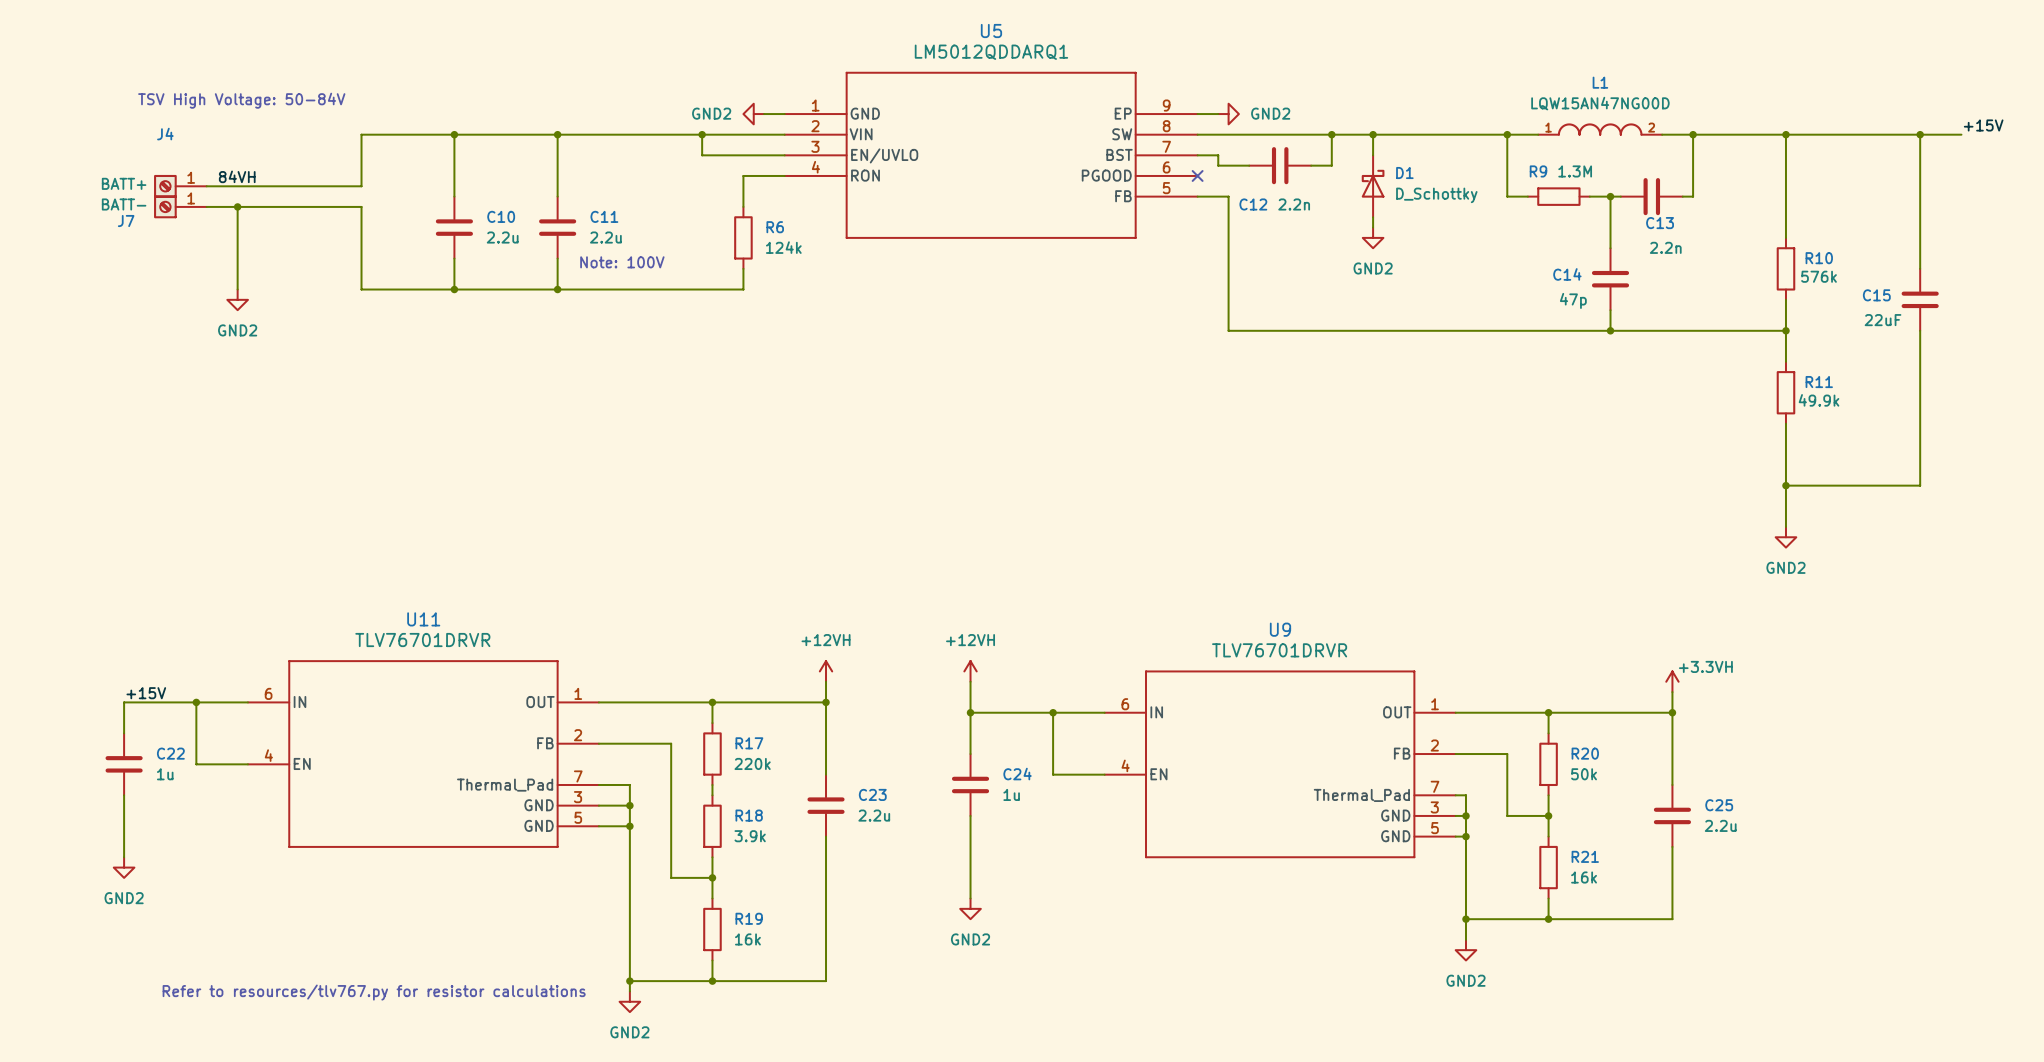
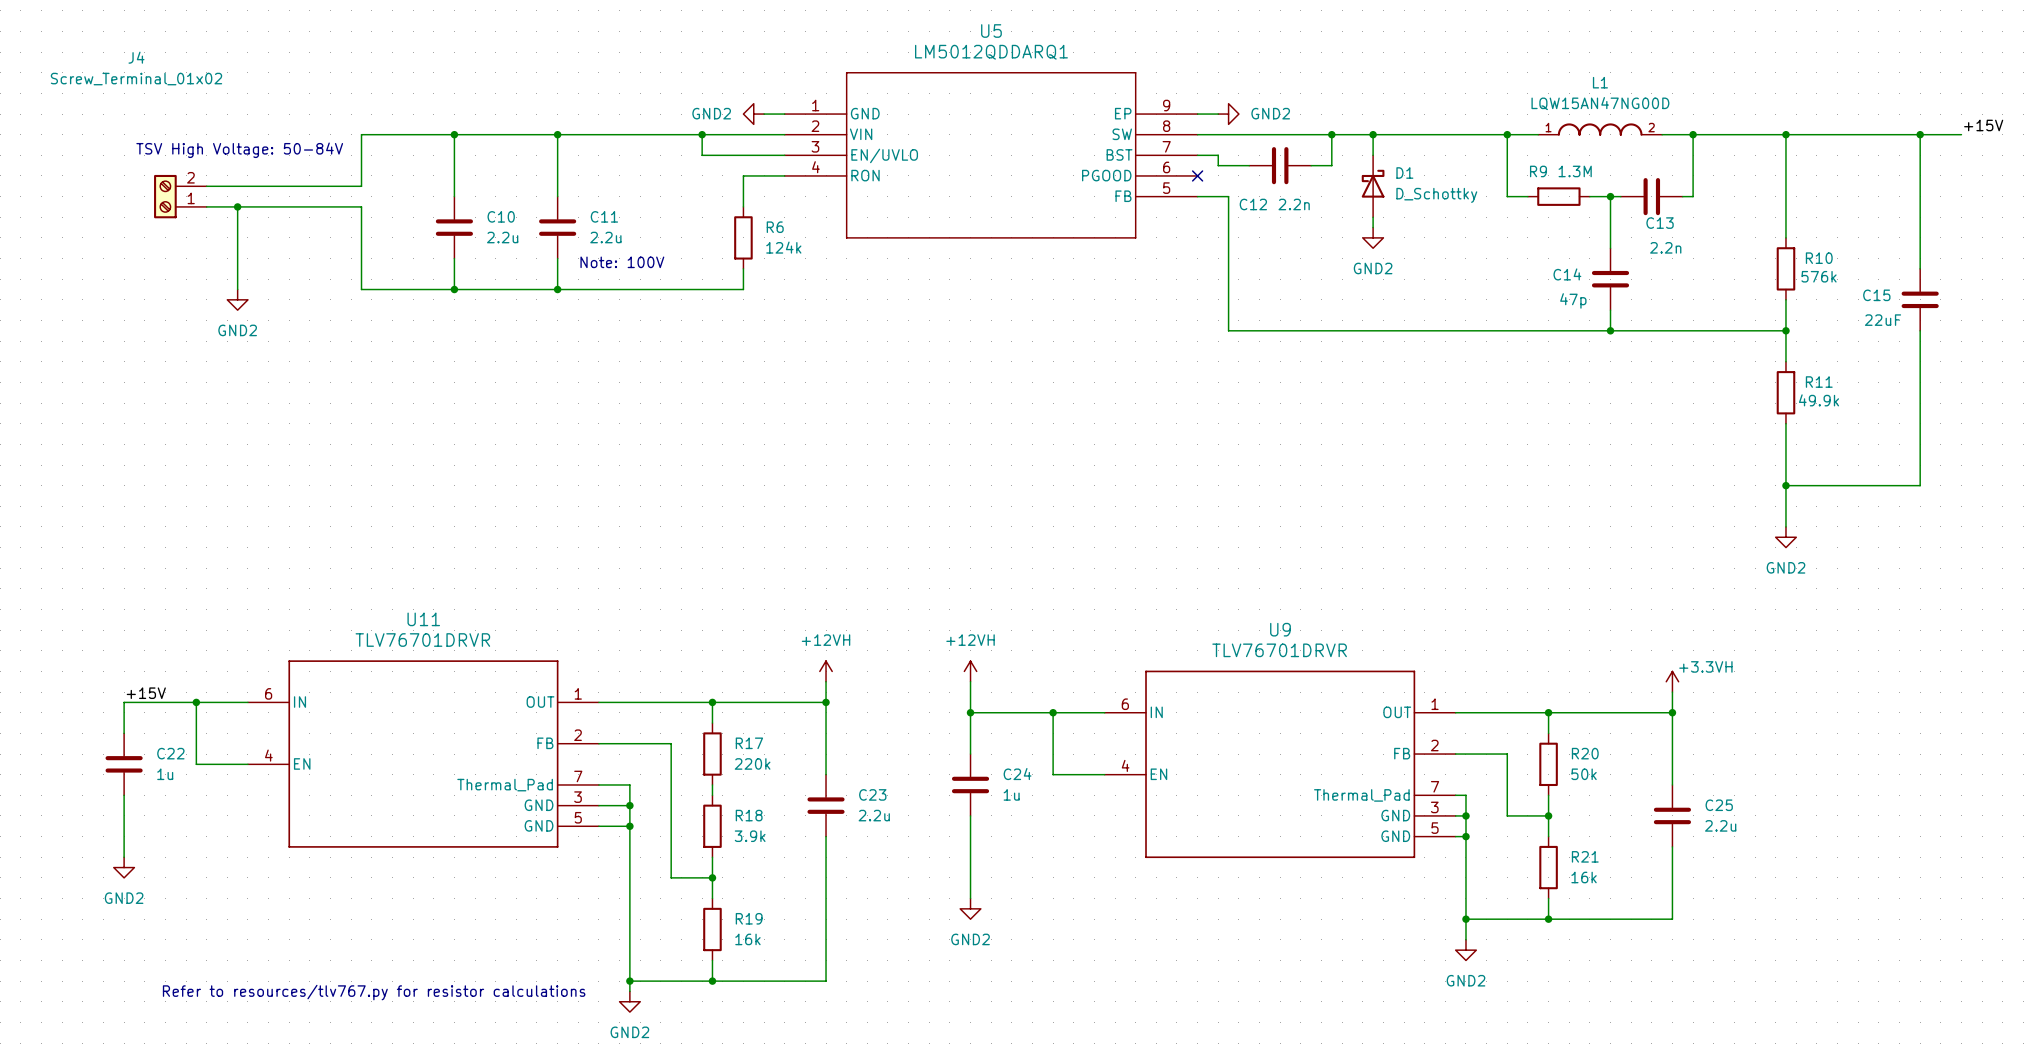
text position: TSV High Voltage: 50-84V (241, 100) -> TSV High Voltage: 50-84V (239, 150)
J4 name position: J4 (165, 134) -> J4 (136, 57)
J4 symbol: [154, 174, 207, 198] -> [154, 174, 207, 219]
label: 84VH (237, 176) -> none
J4 value: BATT+ (124, 183) -> Screw_Terminal_01x02 (136, 79)
J7: BATT- (180, 206) -> none

